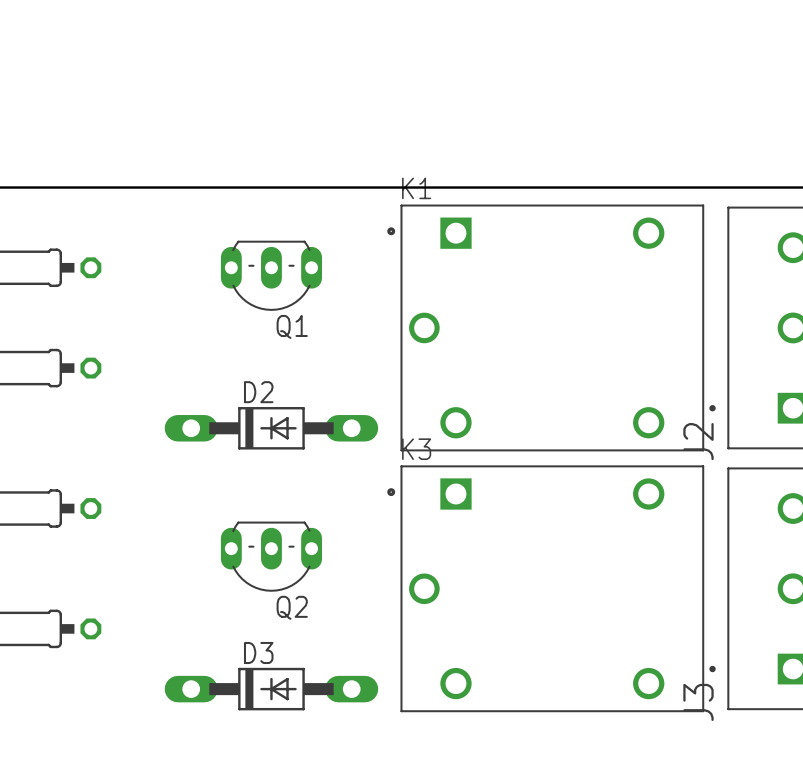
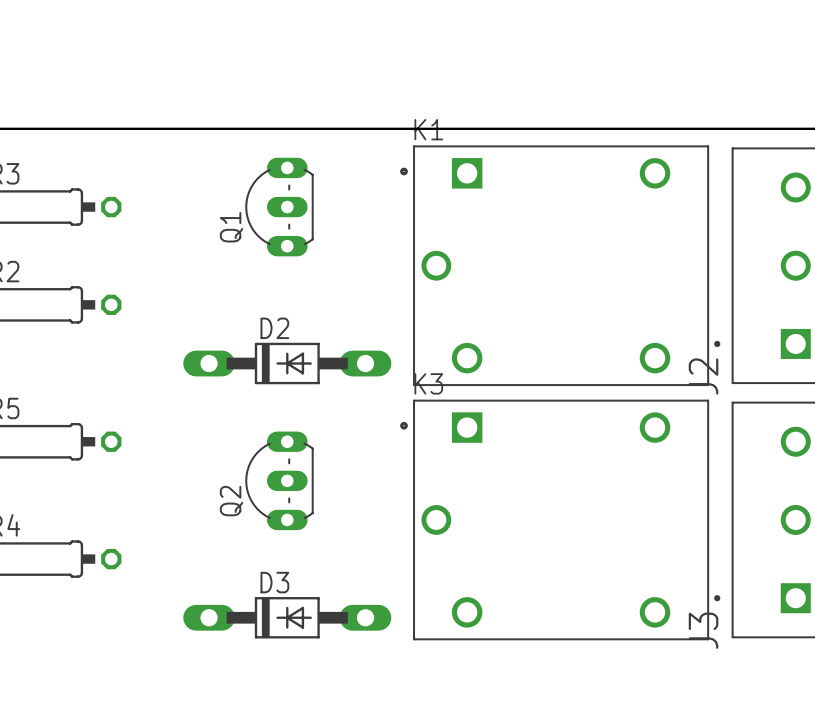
Q1 rotation: 0° (271, 275) -> 90° clockwise (279, 207)
Q2 rotation: 0° (271, 556) -> 90° clockwise (279, 480)

